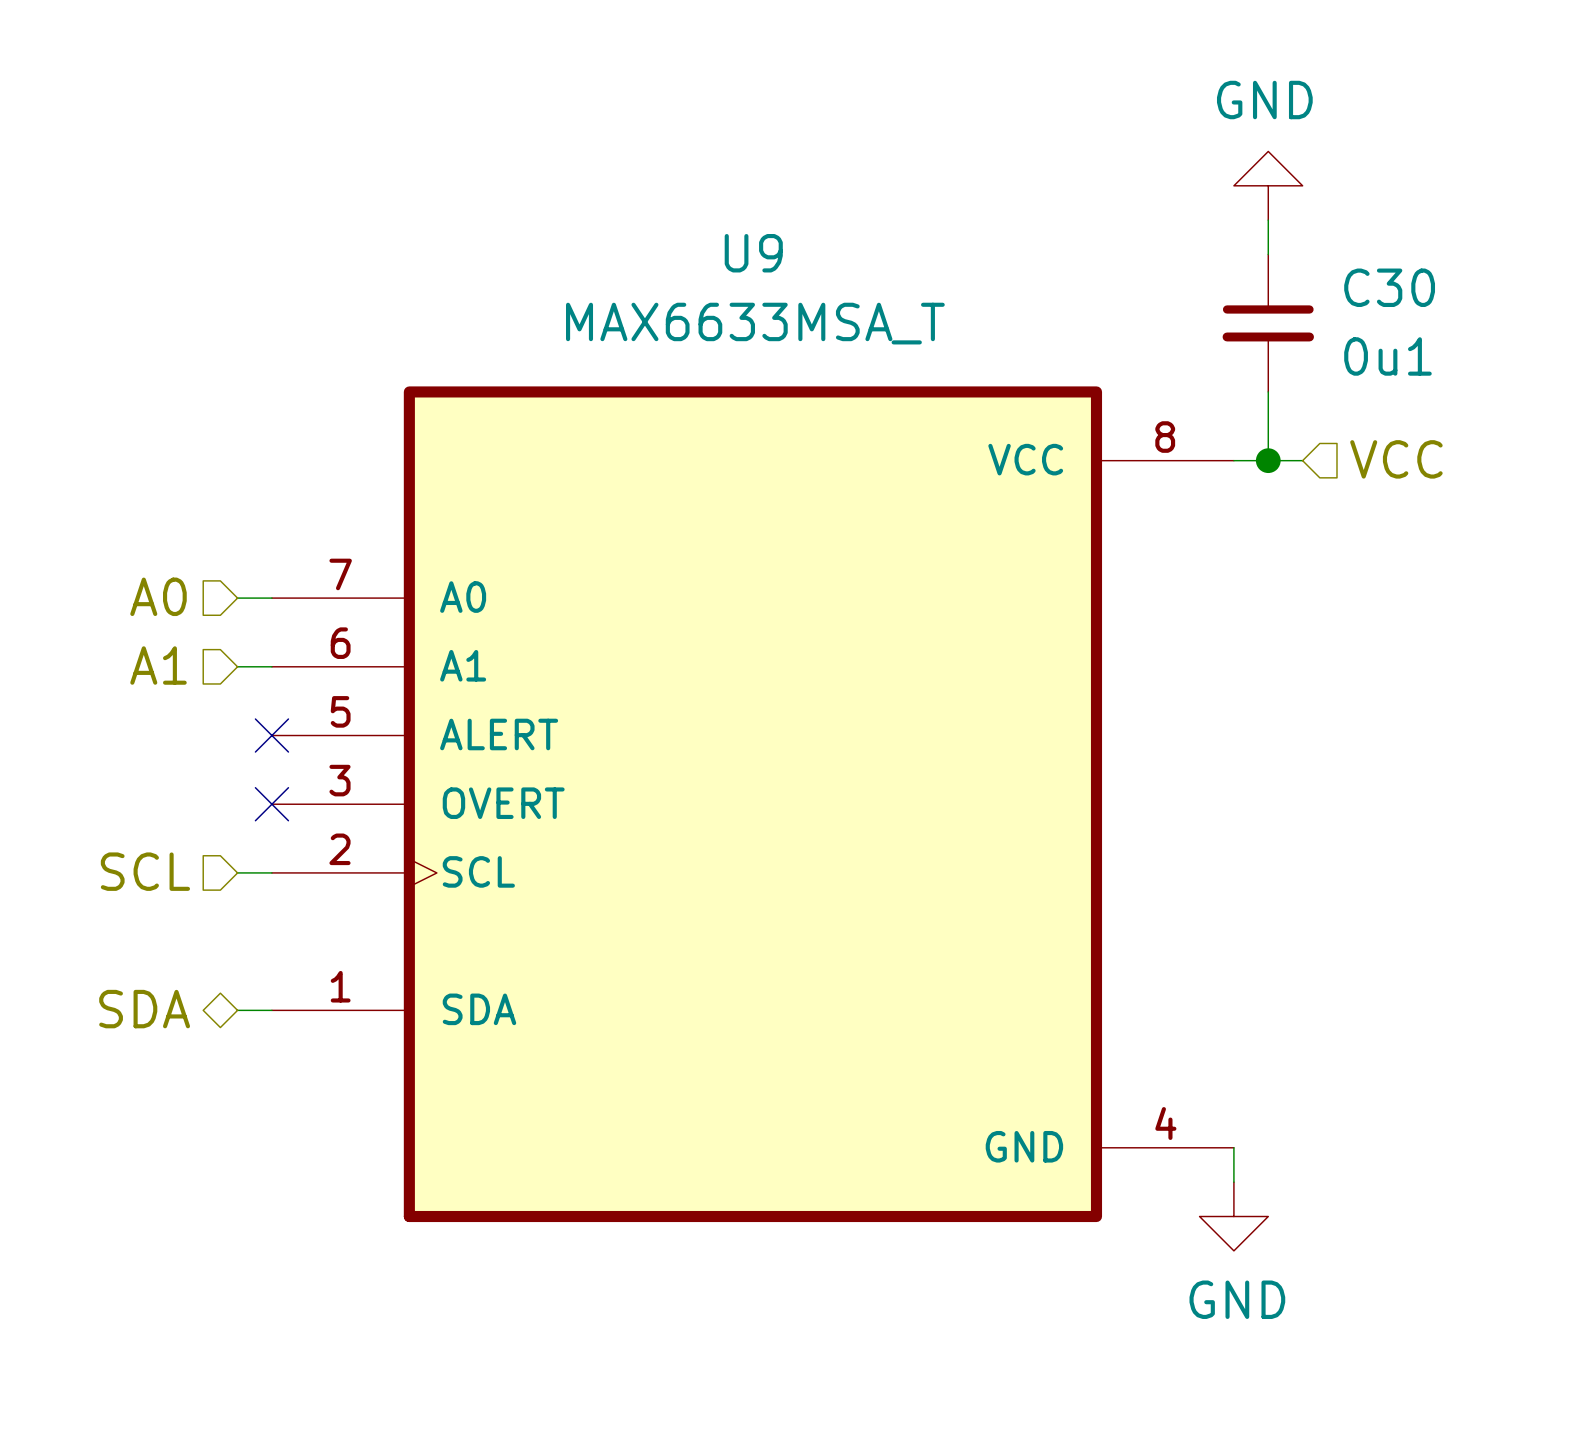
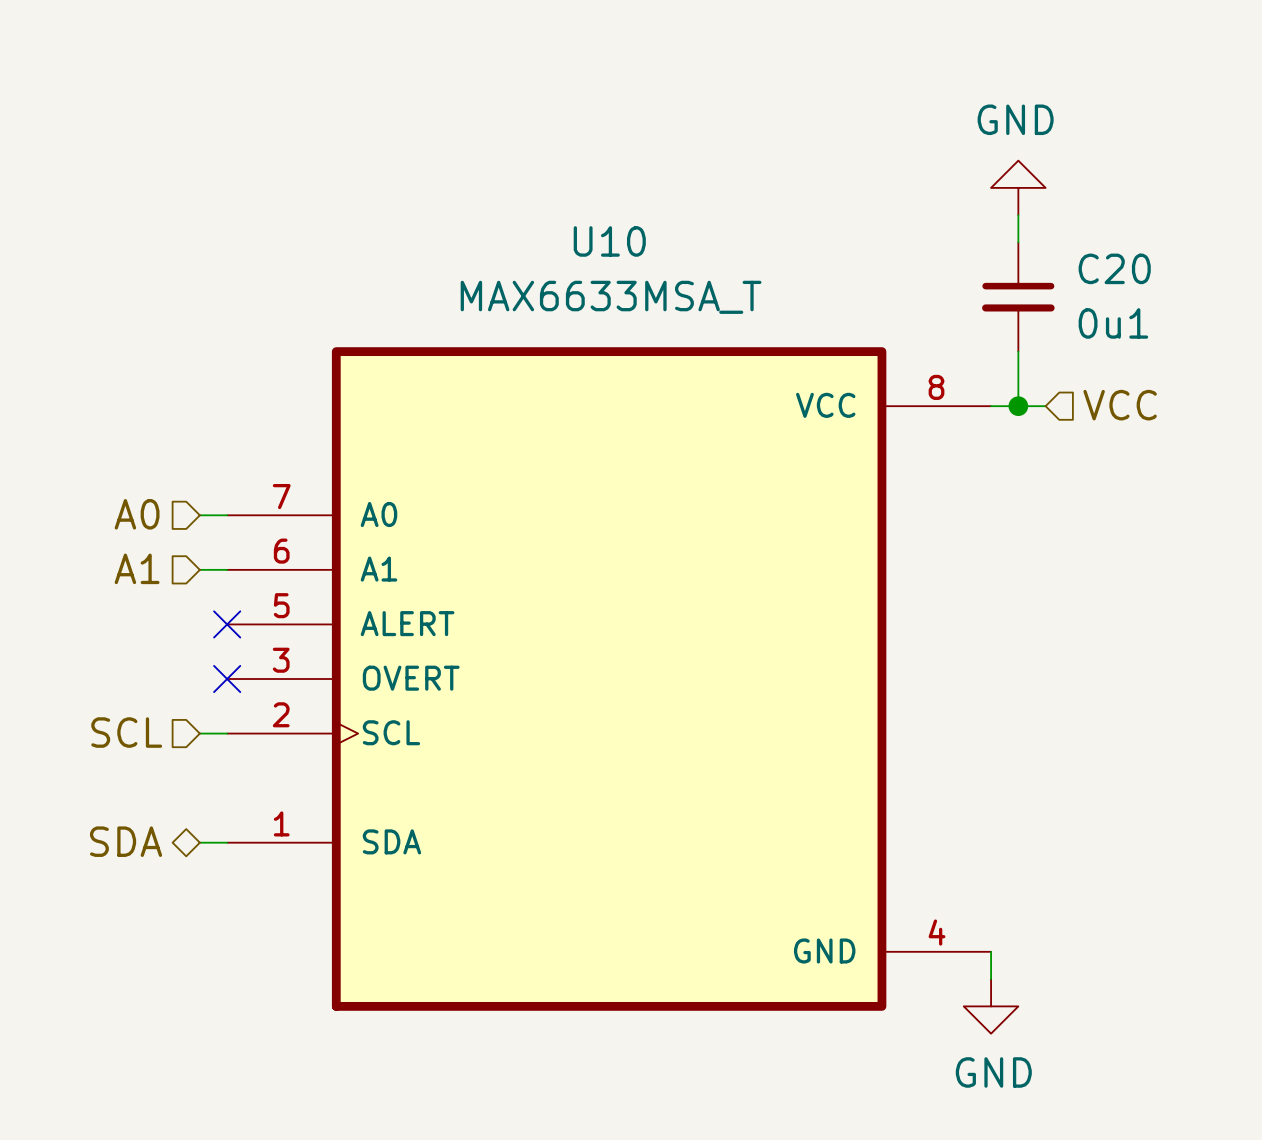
U9 name: U9 (753, 253) -> U10 (609, 241)
C30 name: C30 (1389, 287) -> C20 (1114, 268)

